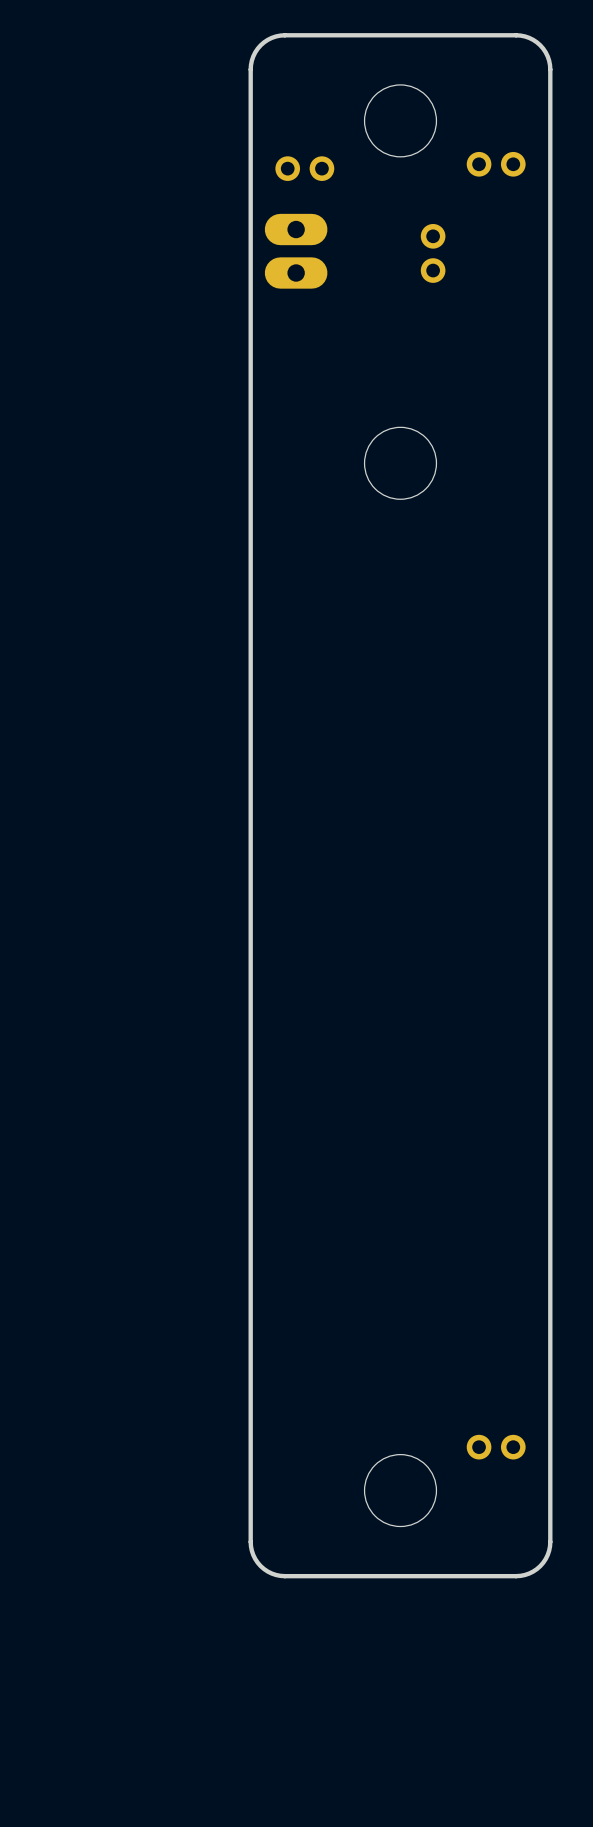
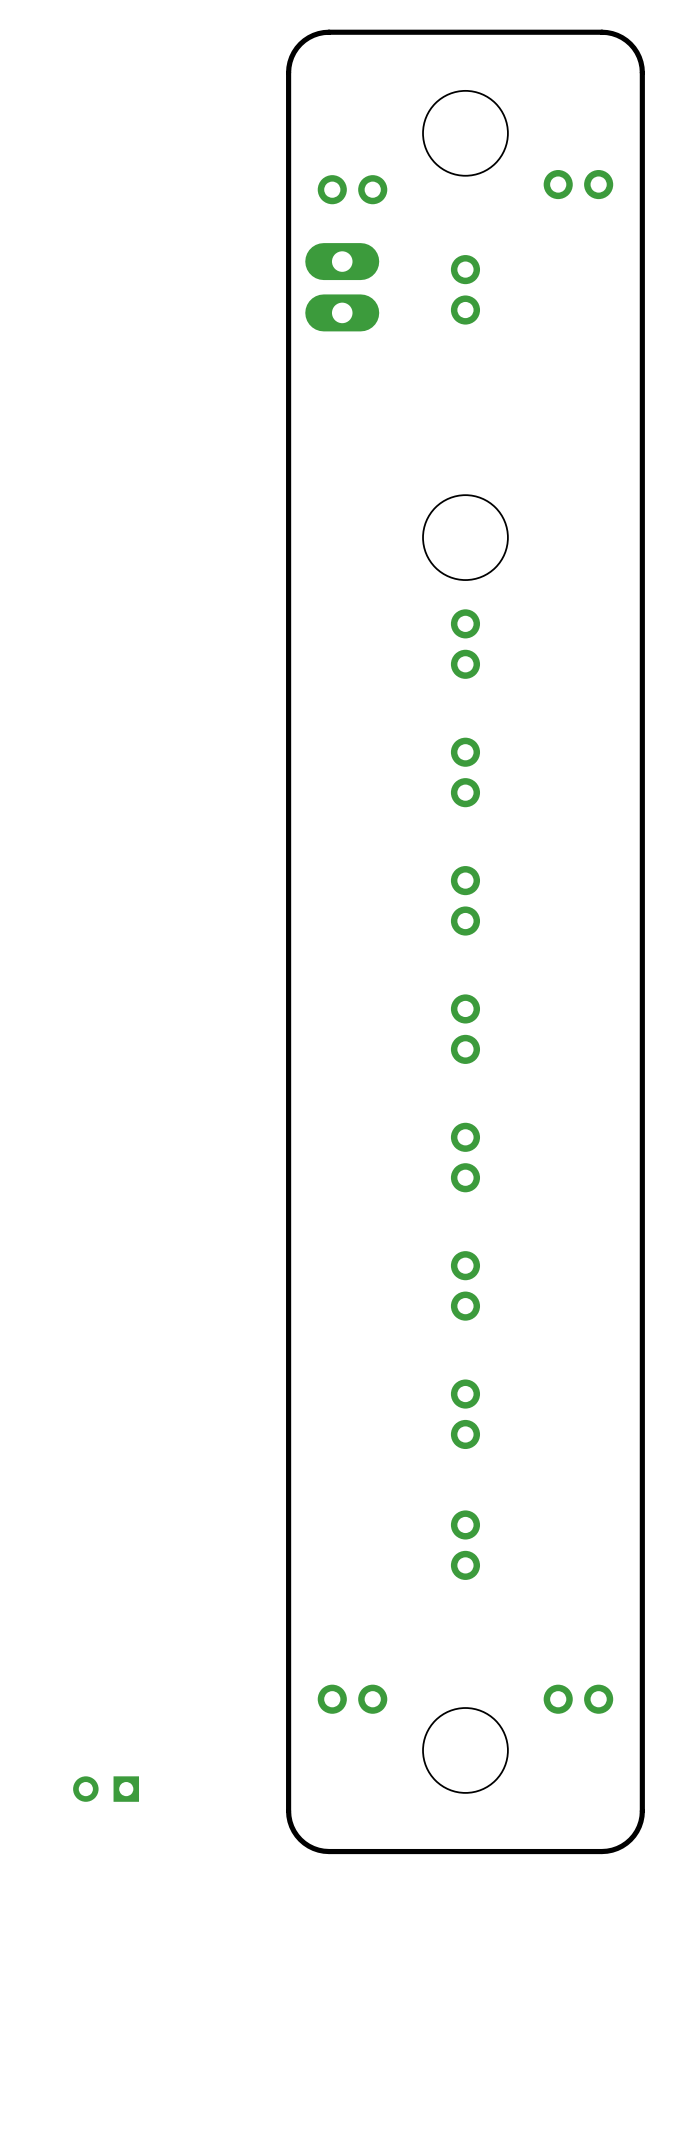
part position: (433, 253) -> (465, 289)
part: none -> (465, 644)
part: none -> (465, 772)
part: none -> (465, 900)
part: none -> (465, 1029)
part: none -> (465, 1157)
part: none -> (465, 1285)
part: none -> (465, 1414)
part: none -> (465, 1545)
part: none -> (352, 1699)
part: none -> (106, 1789)

